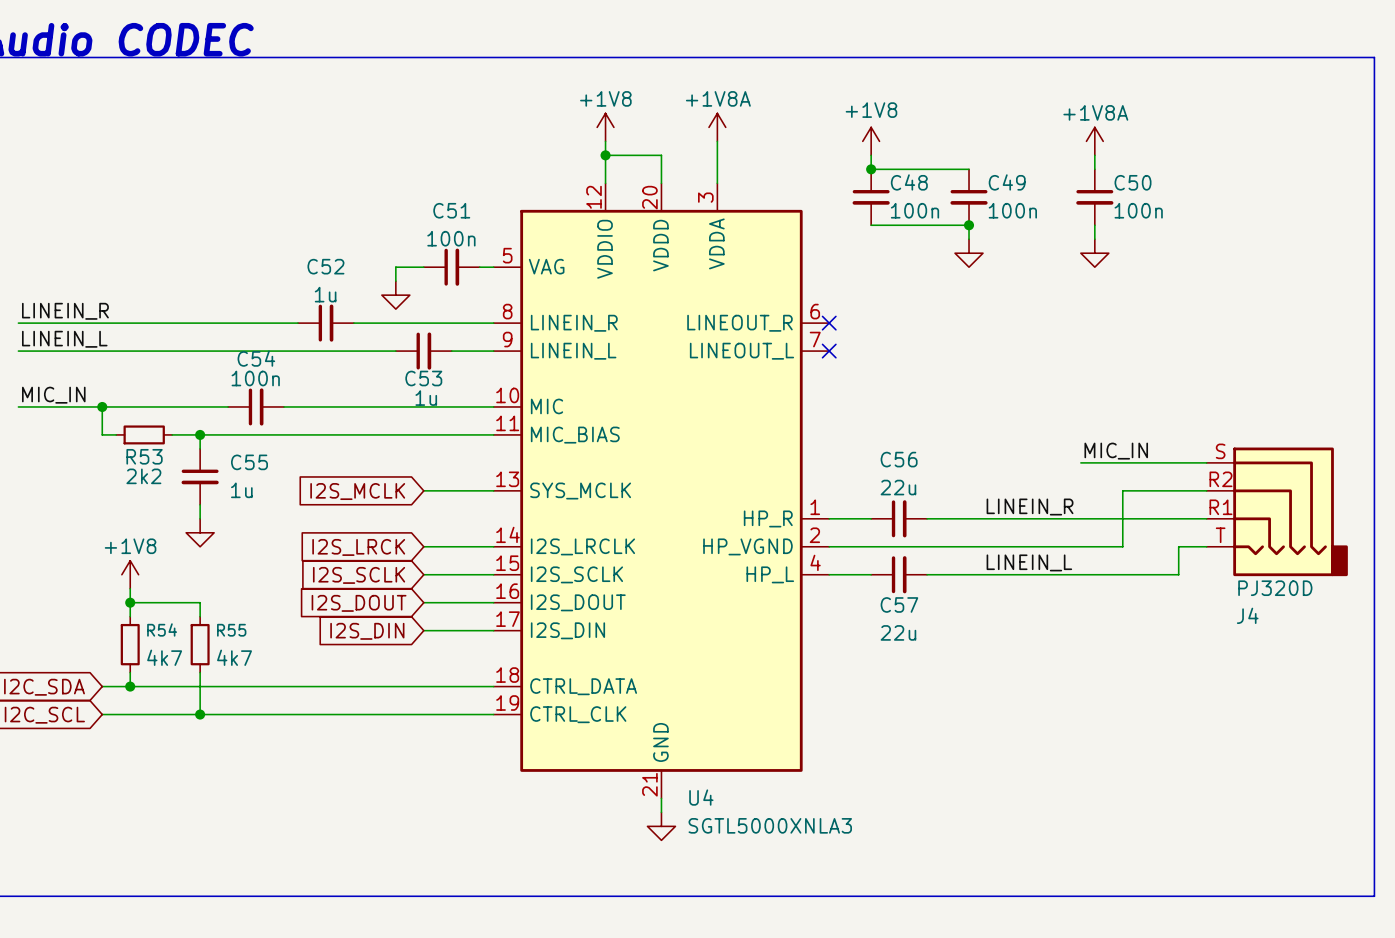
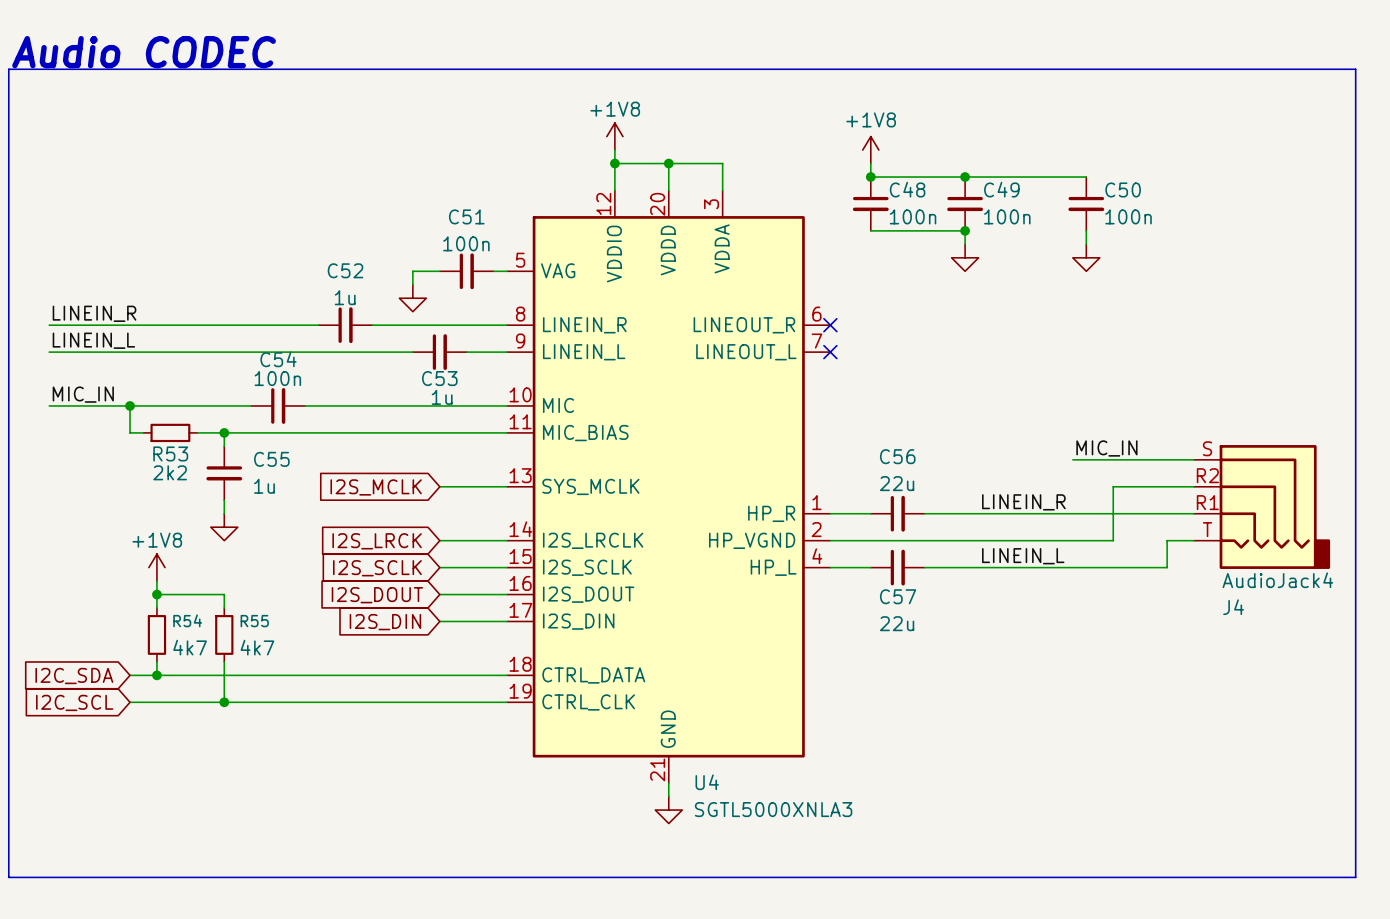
power symbol: +1V8A (717, 127) -> none
wire: (717, 141) (717, 155) -> (668, 163) (722, 163)
power symbol: +1V8A (1094, 141) -> none
junction: none -> (668, 163)
wire: (1094, 155) (1094, 169) -> (965, 177) (1086, 177)
junction: none -> (965, 177)
J4 value: PJ320D (1275, 588) -> AudioJack4 (1277, 580)

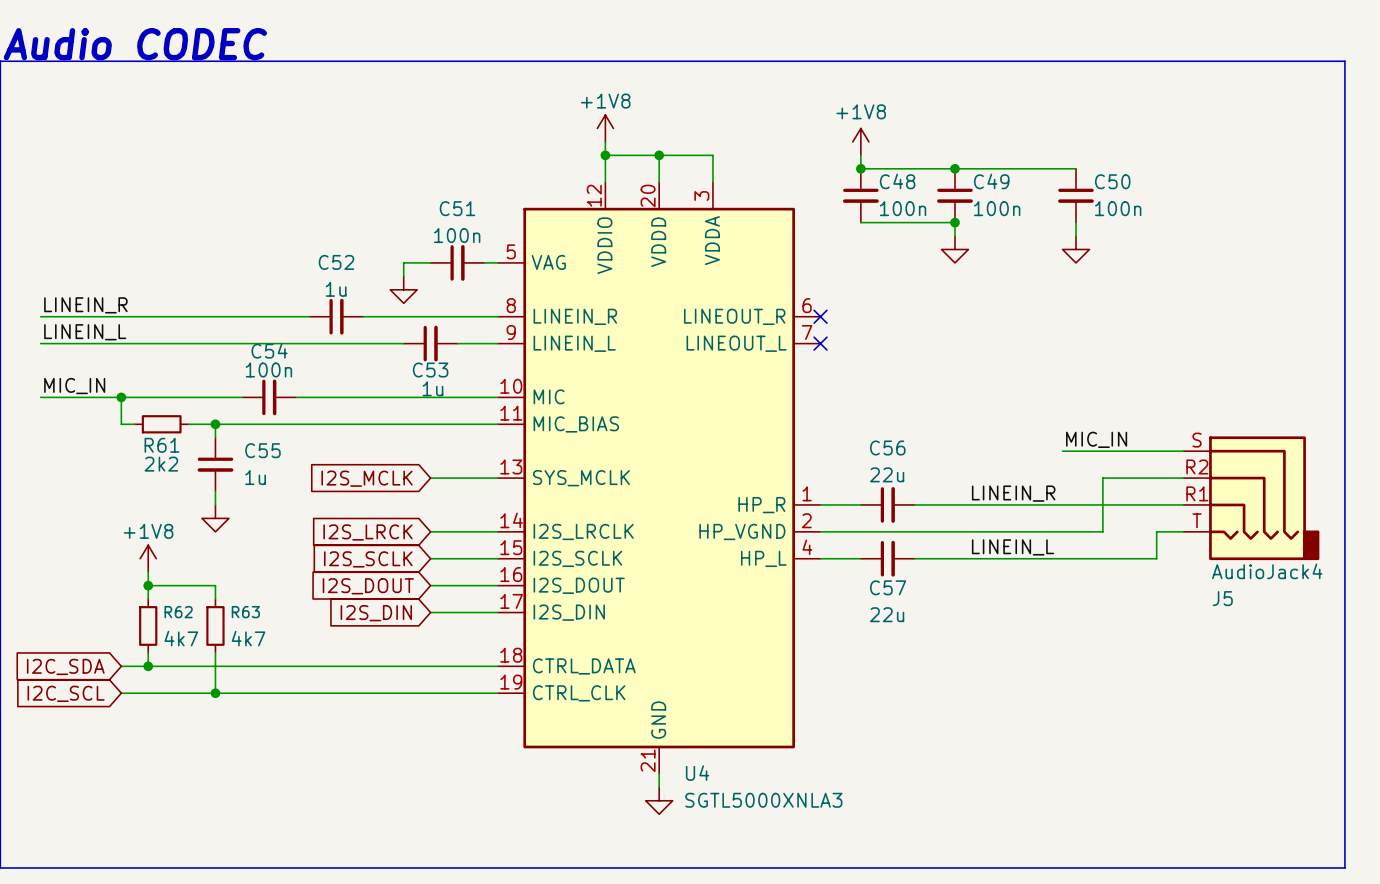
R53 name: R53 (170, 453) -> R61 (162, 445)
J4 name: J4 (1233, 607) -> J5 (1222, 598)
R54 name: R54 (187, 620) -> R62 (178, 612)
R55 name: R55 (254, 621) -> R63 (245, 612)

